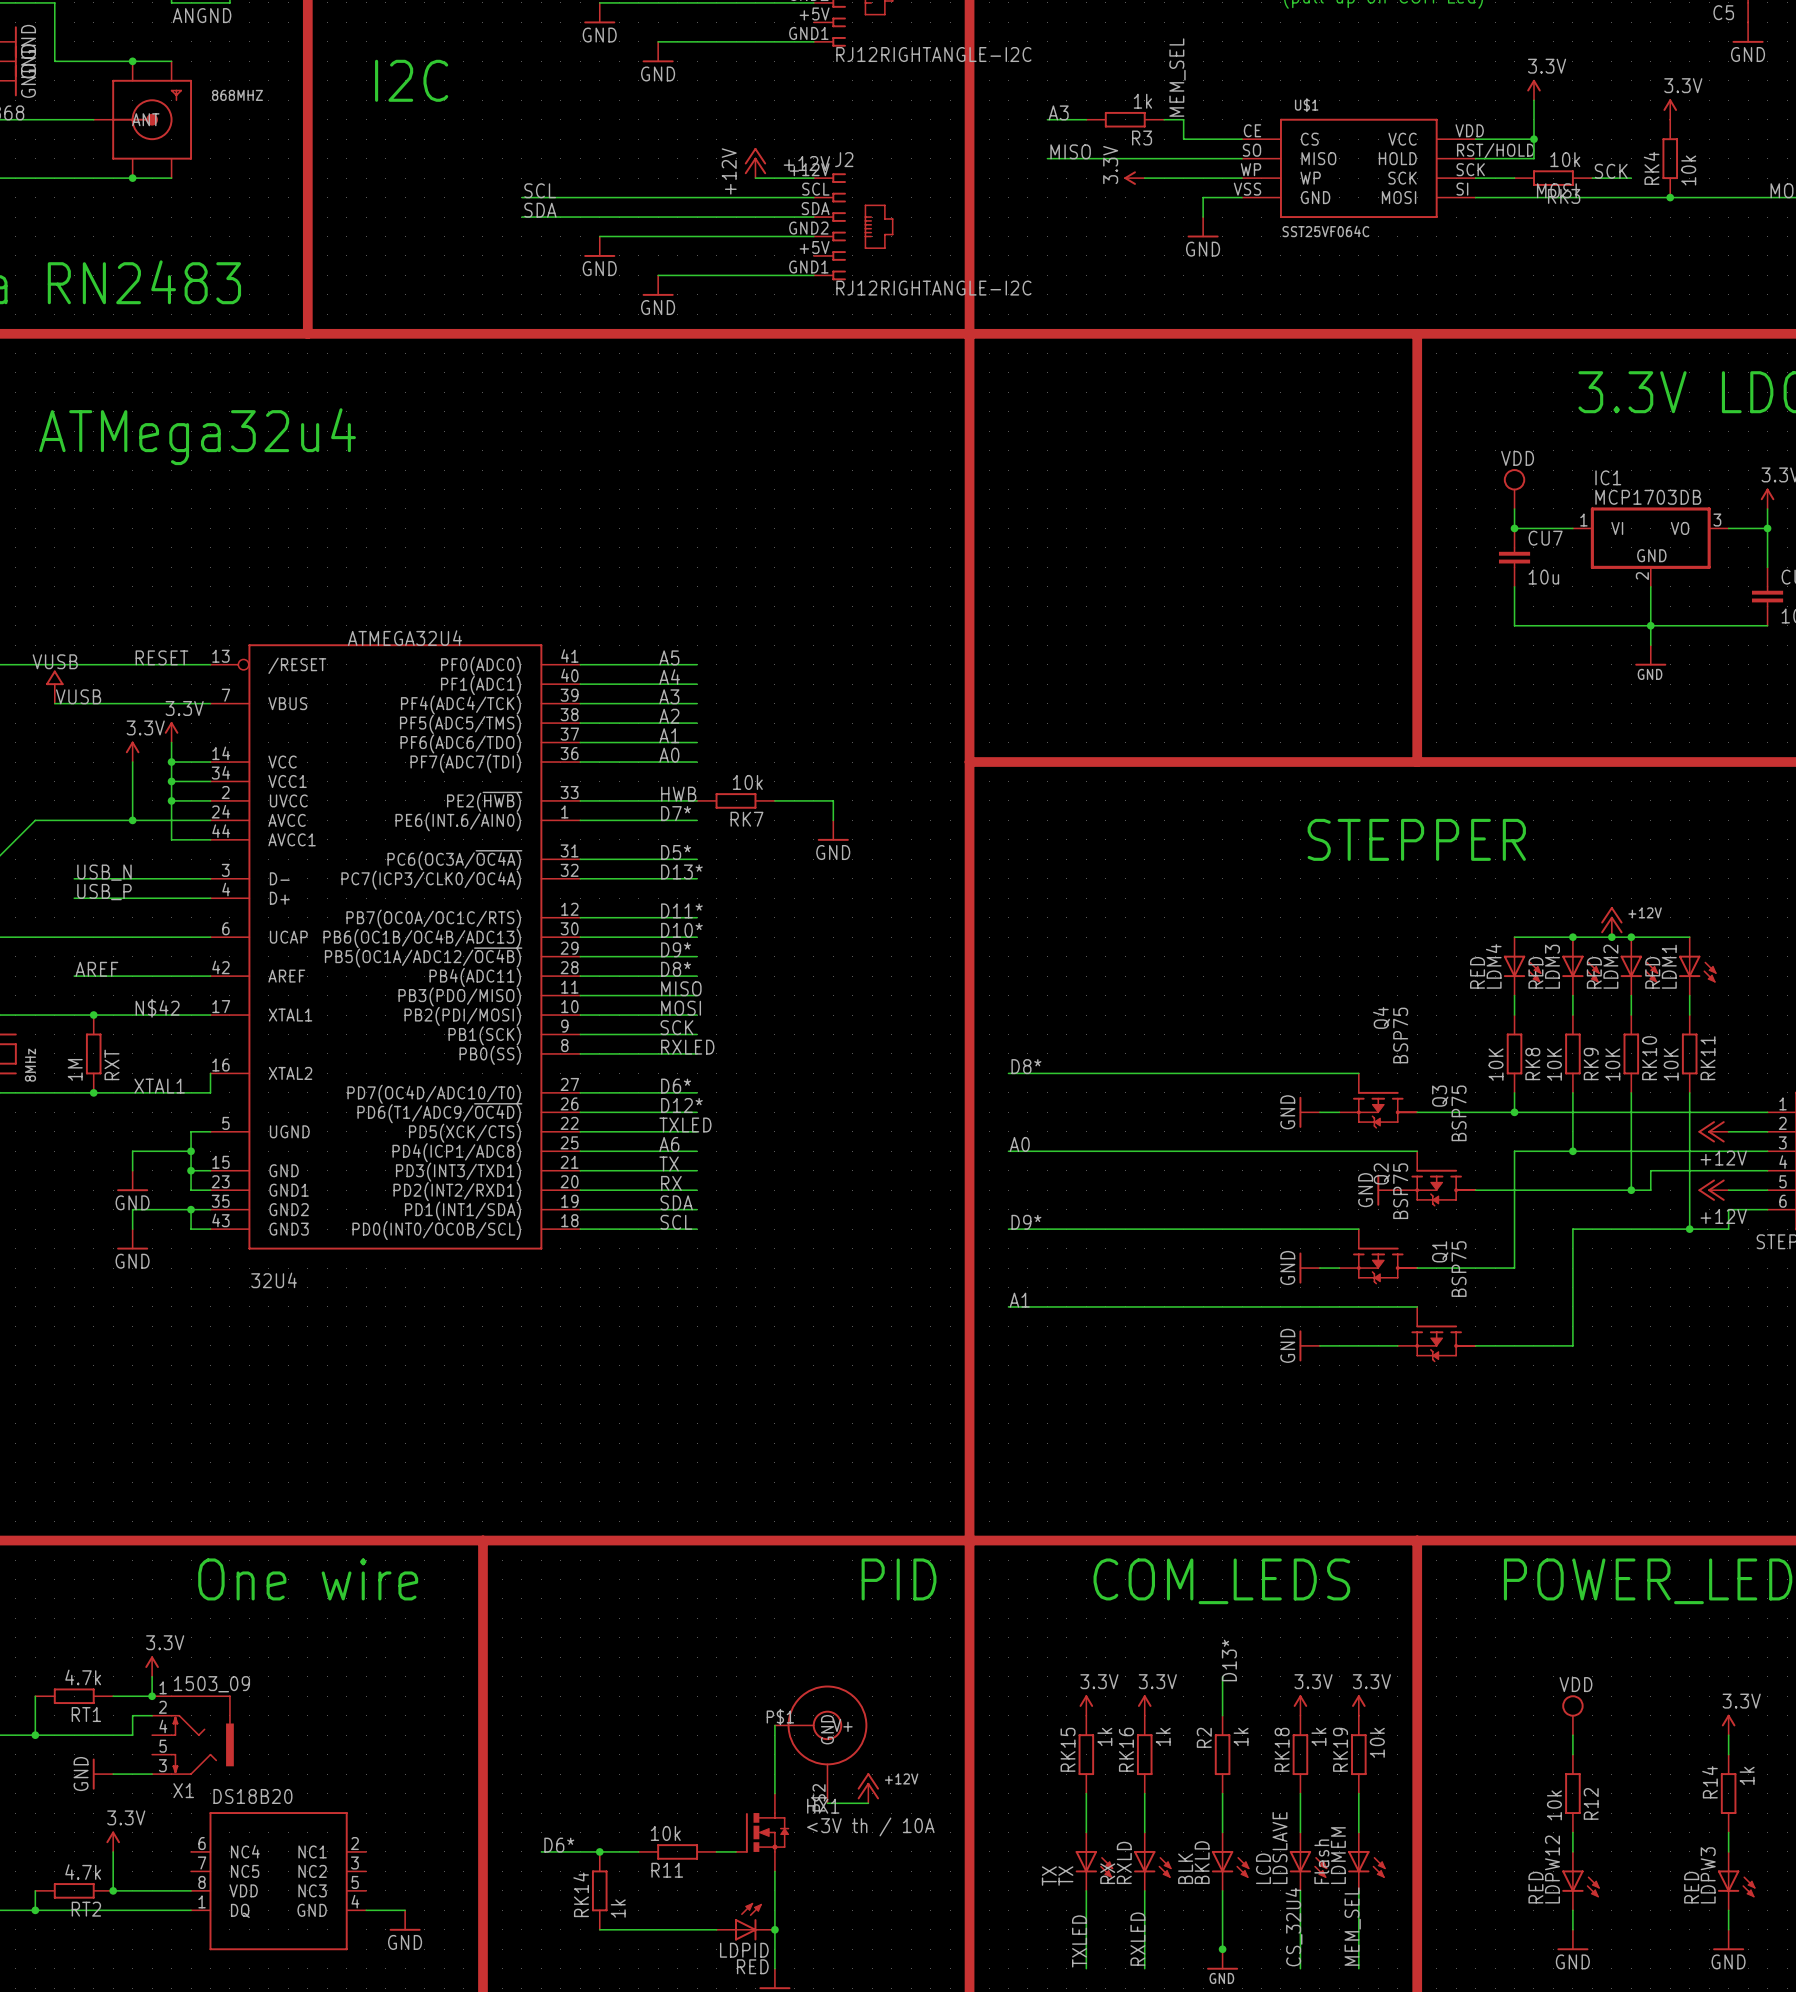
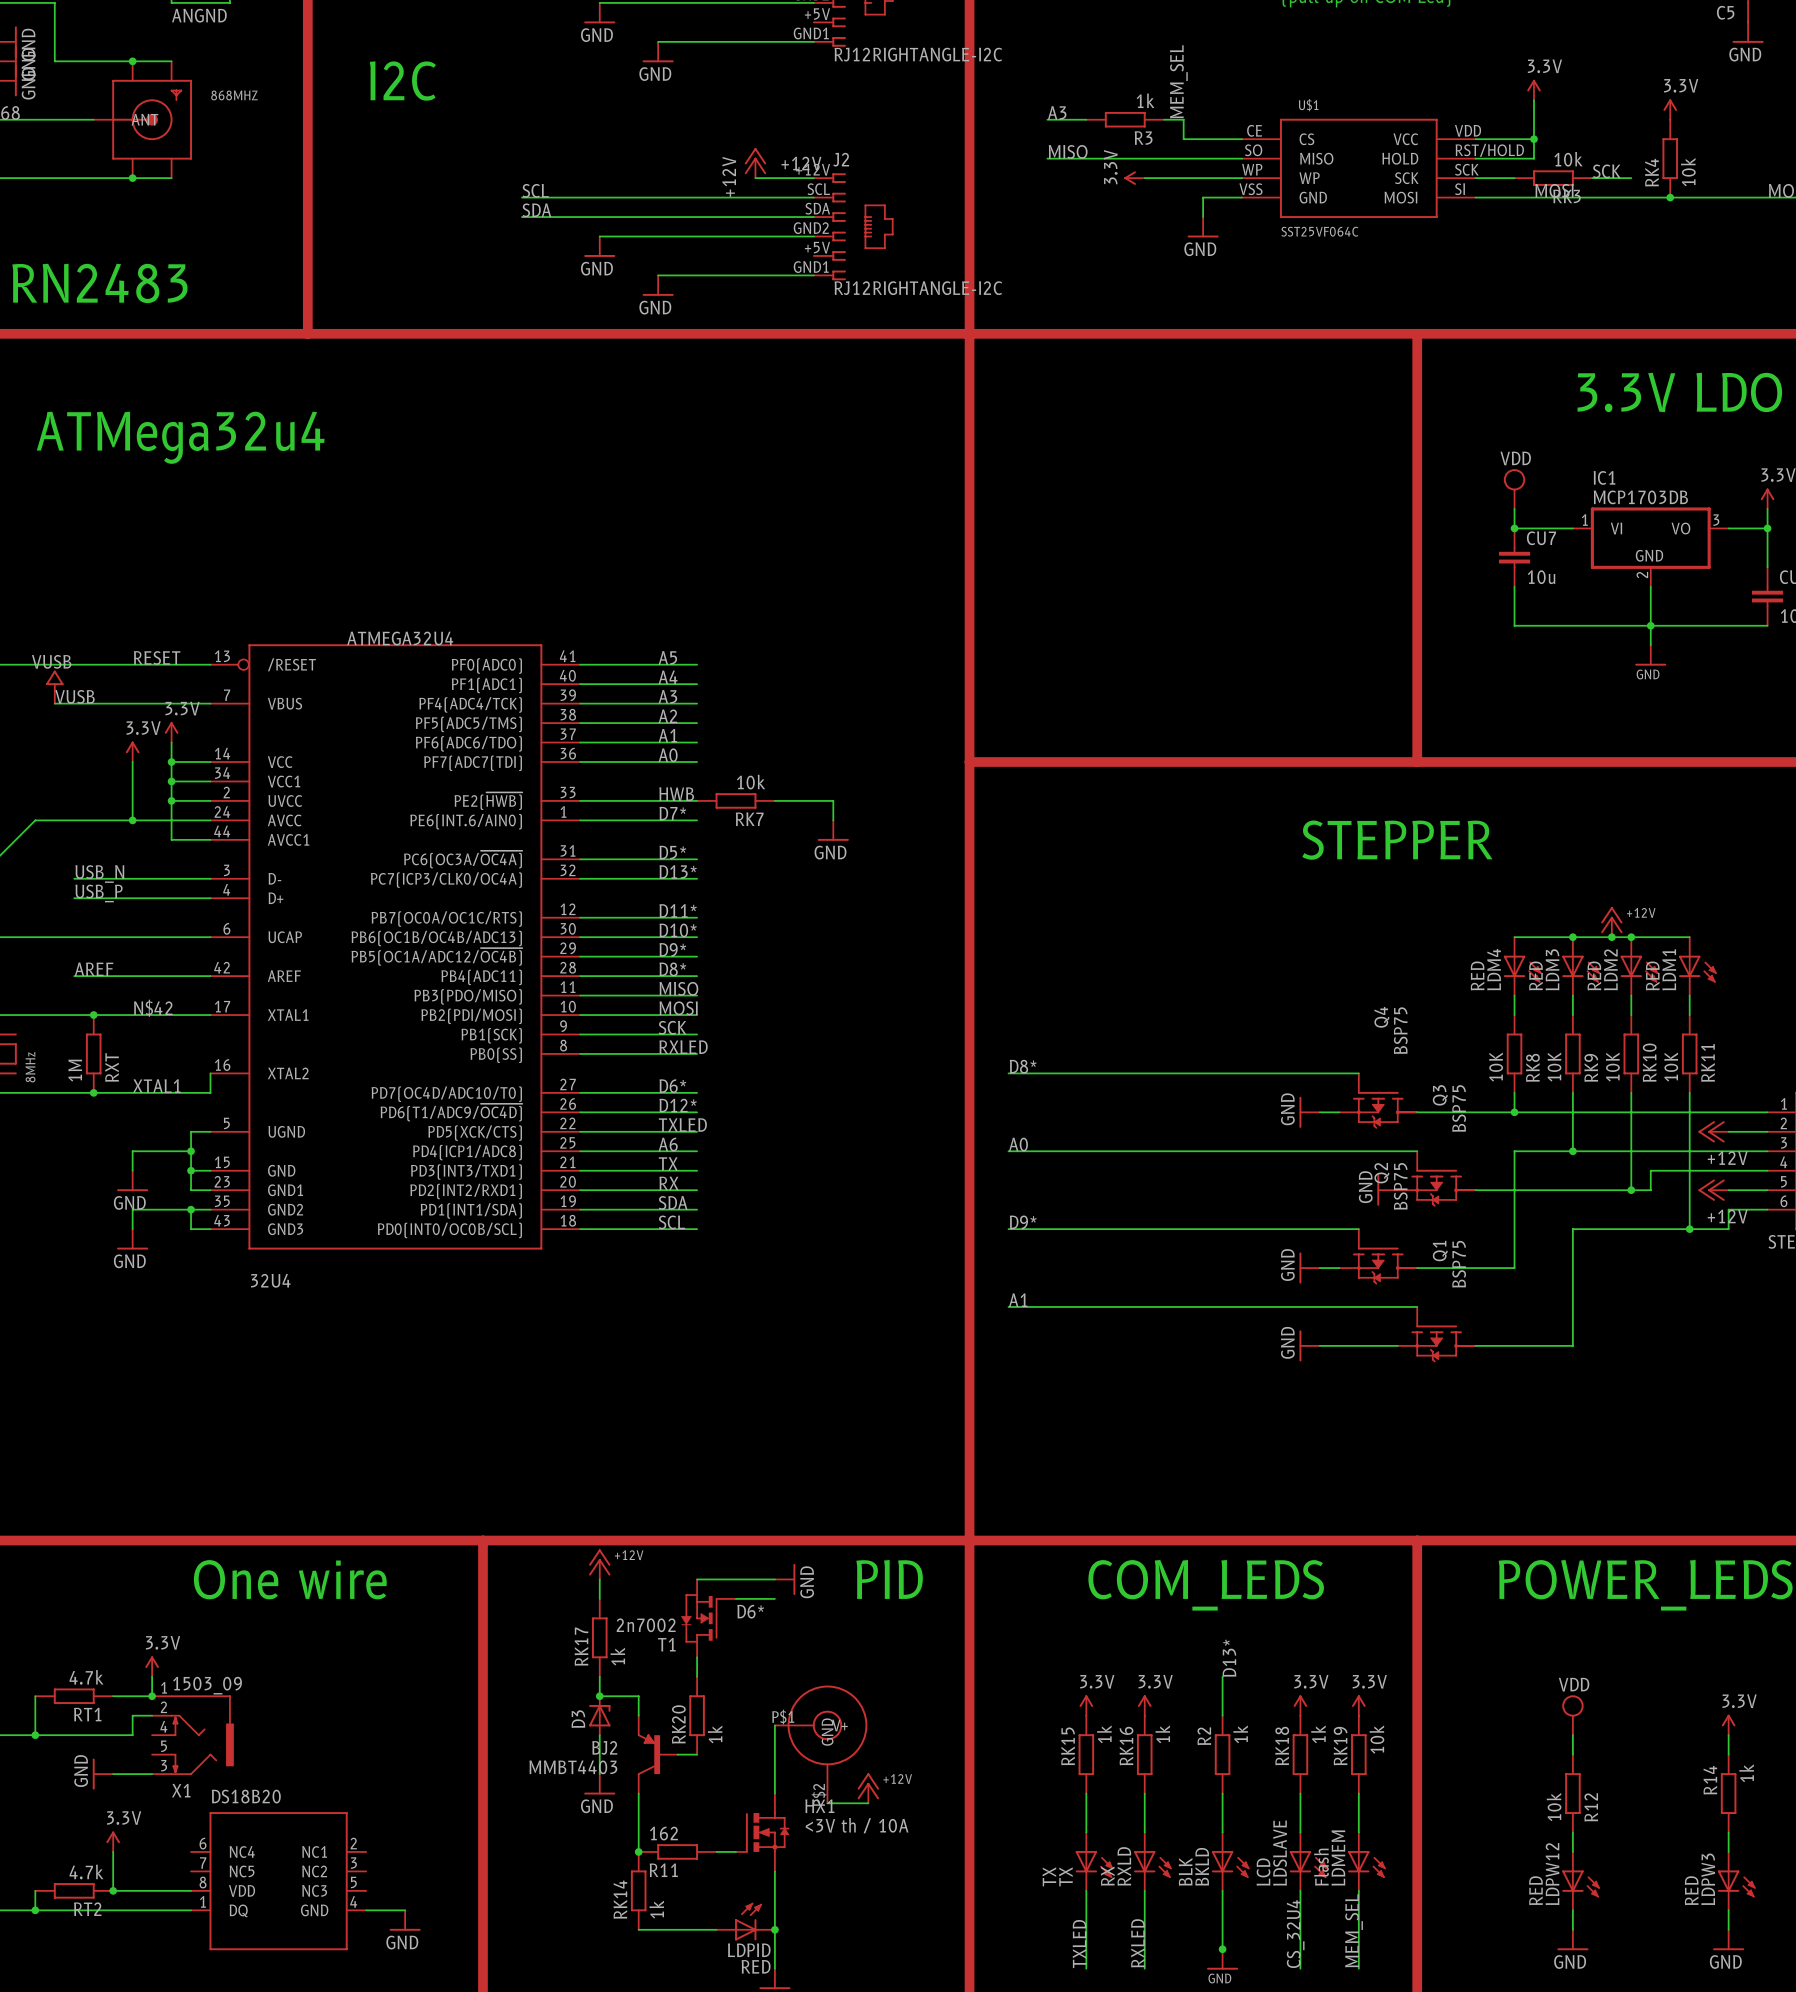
power symbol: none -> +12V (599, 1564)
wire: none -> (599, 1579) (599, 1598)
wire: none -> (697, 1579) (774, 1579)
power symbol: none -> GND (785, 1579)
wire: none -> (736, 1598) (774, 1598)
label: none -> D6* (750, 1611)
T1: none -> 2n7002 (708, 1618)
RK17: none -> 1k (599, 1637)
wire: none -> (697, 1657) (697, 1676)
wire: none -> (599, 1676) (599, 1696) (638, 1696) (638, 1715)
junction: none -> (599, 1696)
D3: none -> (599, 1715)
RK20: none -> 1k (697, 1715)
wire: none -> (599, 1735) (599, 1774)
BJ2: none -> MMBT4403 (657, 1754)
wire: none -> (677, 1754) (697, 1754)
power symbol: none -> GND (599, 1784)
R11 value: 10k (665, 1833) -> 162 (663, 1833)
label: D6* (559, 1845) -> none
wire: (541, 1851) (638, 1851) -> (638, 1793) (638, 1851)
junction position: (599, 1851) -> (638, 1851)
RK14 position: (599, 1890) -> (638, 1890)
wire: (599, 1929) (638, 1929) -> none

